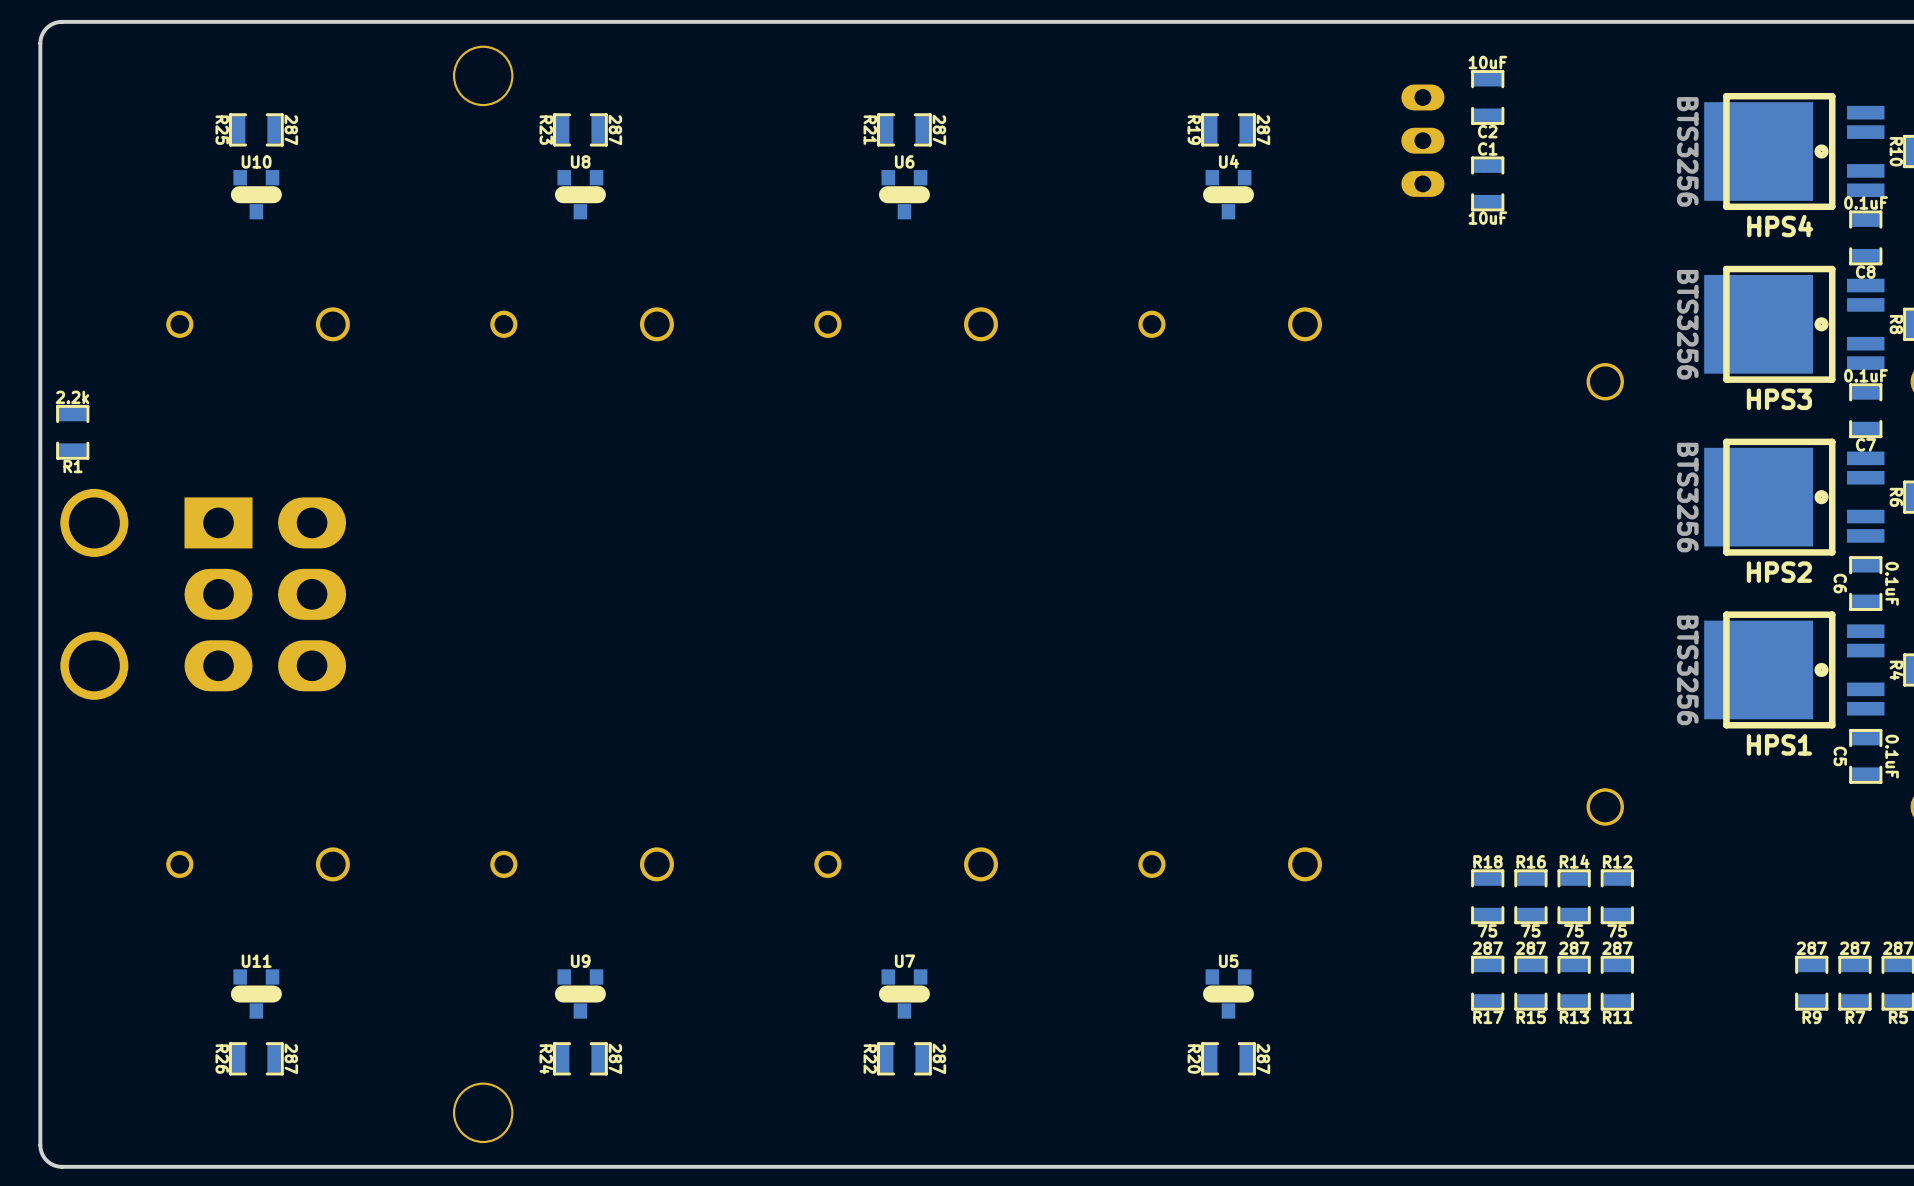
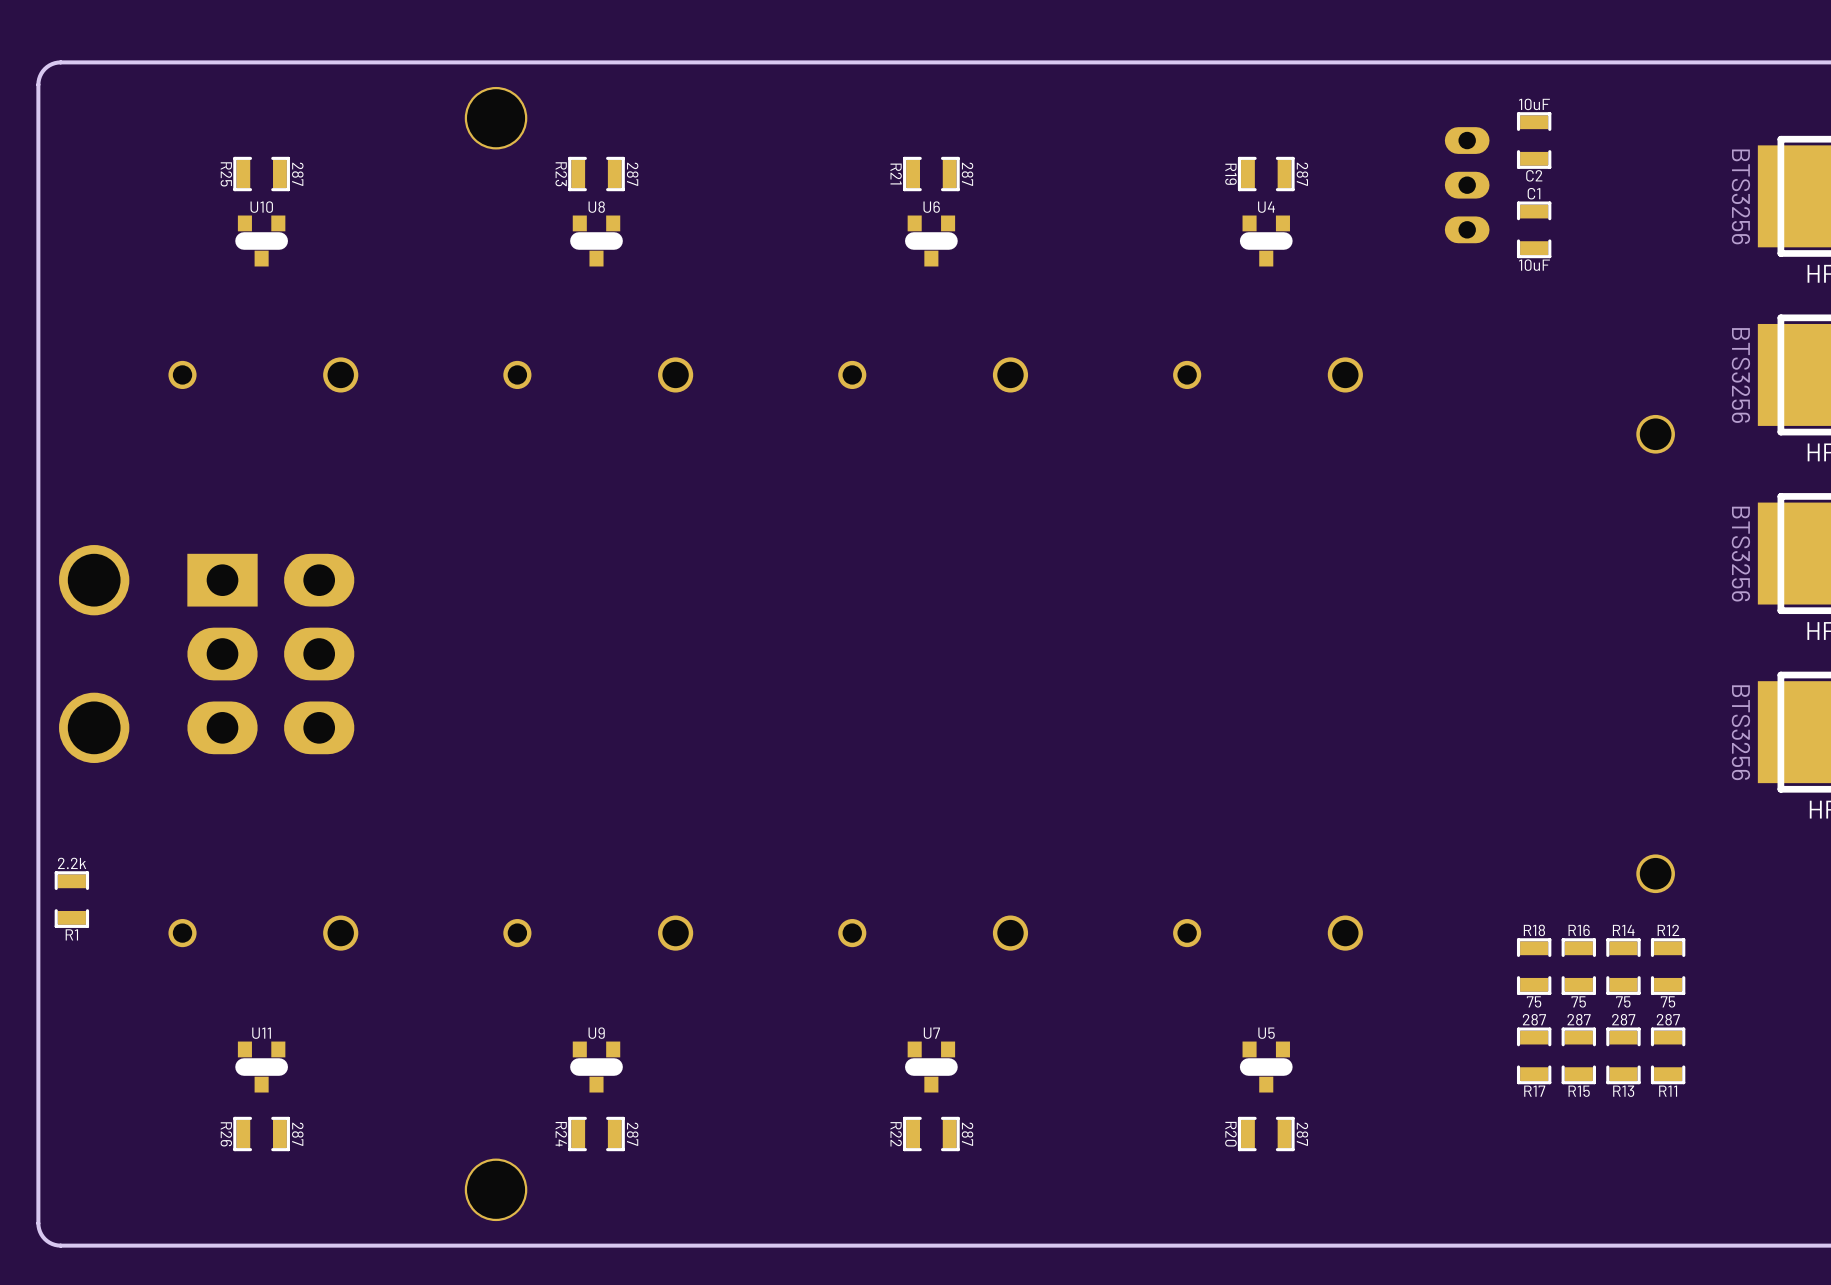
R1 position: (72, 432) -> (71, 899)

